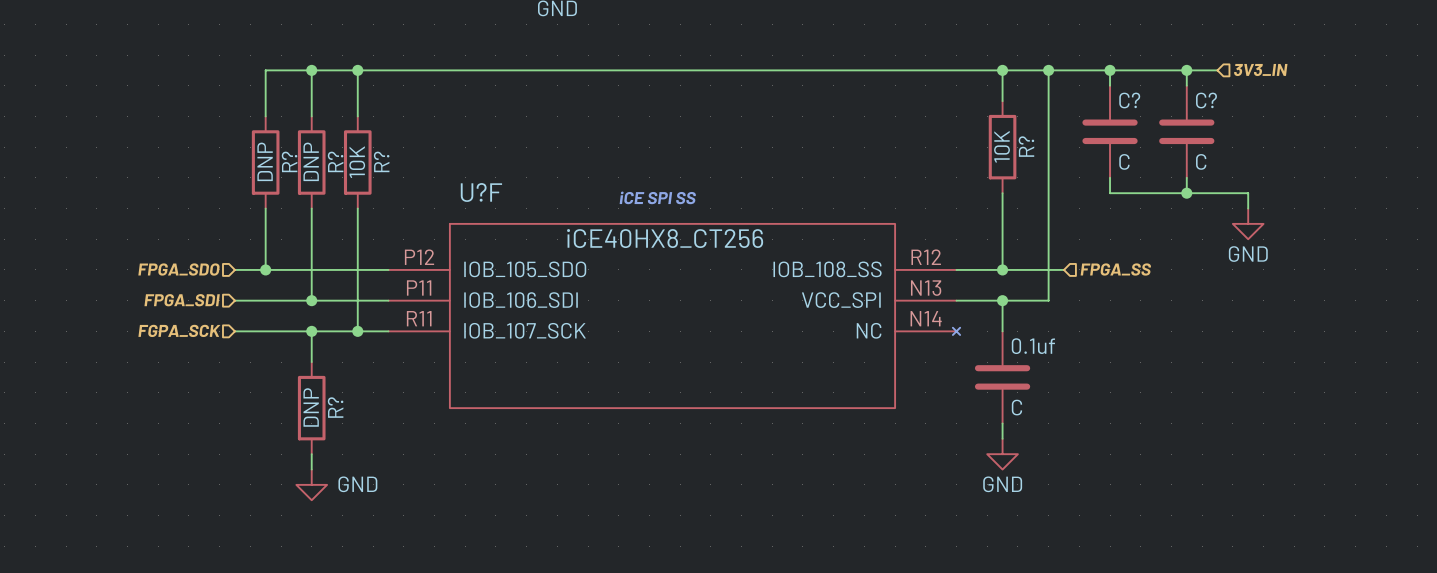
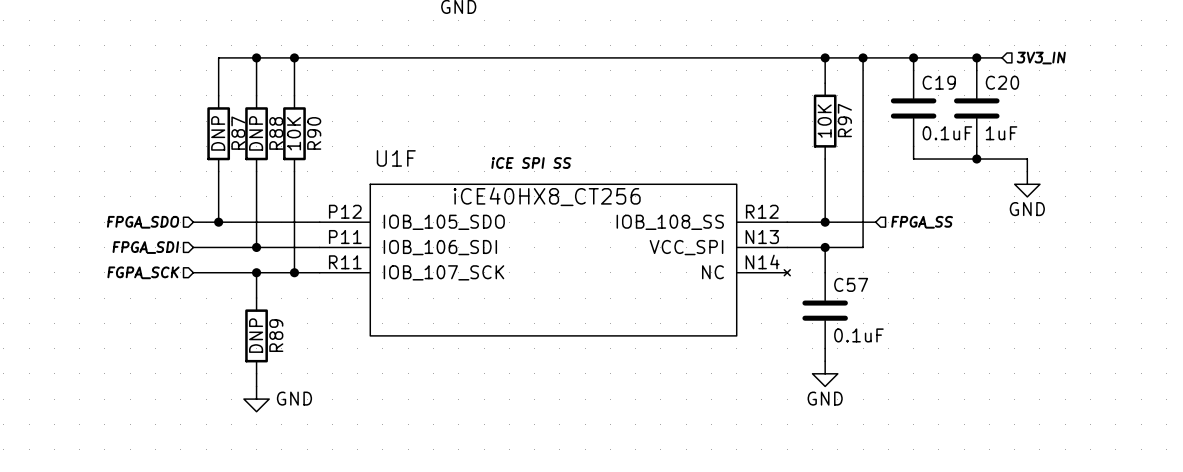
C? name: C? (1129, 100) -> C19 (939, 82)
C? name: C? (1206, 100) -> C20 (1002, 82)
R? name: R? (1026, 146) -> R97 (844, 120)
R? name: R? (289, 161) -> R87 (238, 133)
R? name: R? (335, 161) -> R88 (276, 133)
R? name: R? (381, 161) -> R90 (314, 133)
C? value: C (1124, 161) -> 0.1uF (947, 133)
C? value: C (1201, 161) -> 1uF (1001, 133)
U?F name: U?F (481, 192) -> U1F (396, 158)
0.1uf name: 0.1uf (1033, 346) -> C57 (851, 284)
R? name: R? (335, 407) -> R89 (276, 335)
0.1uf value: C (1016, 407) -> 0.1uF (858, 335)

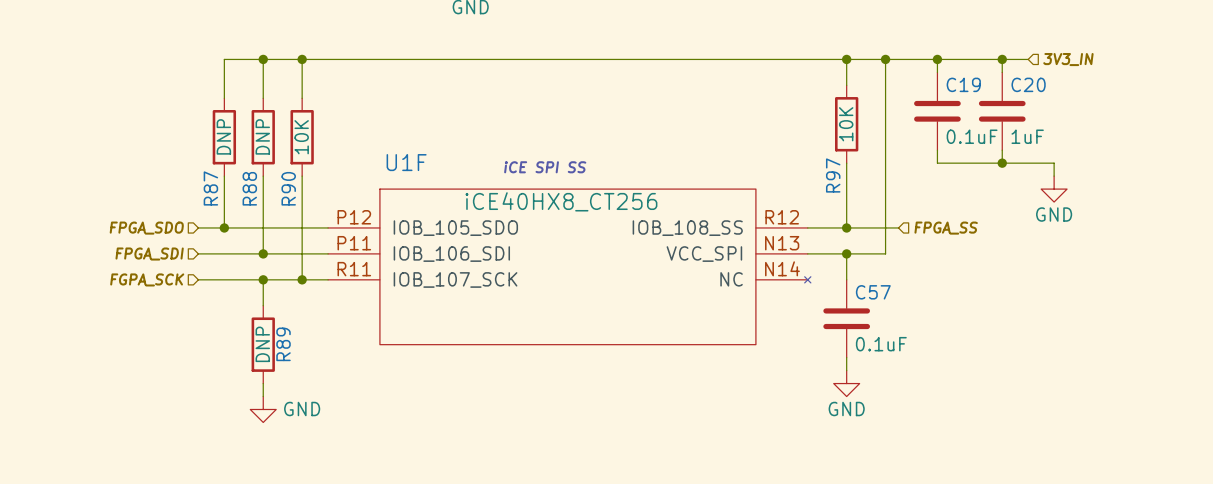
R97 name position: R97 (844, 120) -> R97 (833, 175)
R87 name position: R87 (238, 133) -> R87 (210, 188)
R88 name position: R88 (276, 133) -> R88 (249, 188)
R90 name position: R90 (314, 133) -> R90 (288, 188)

